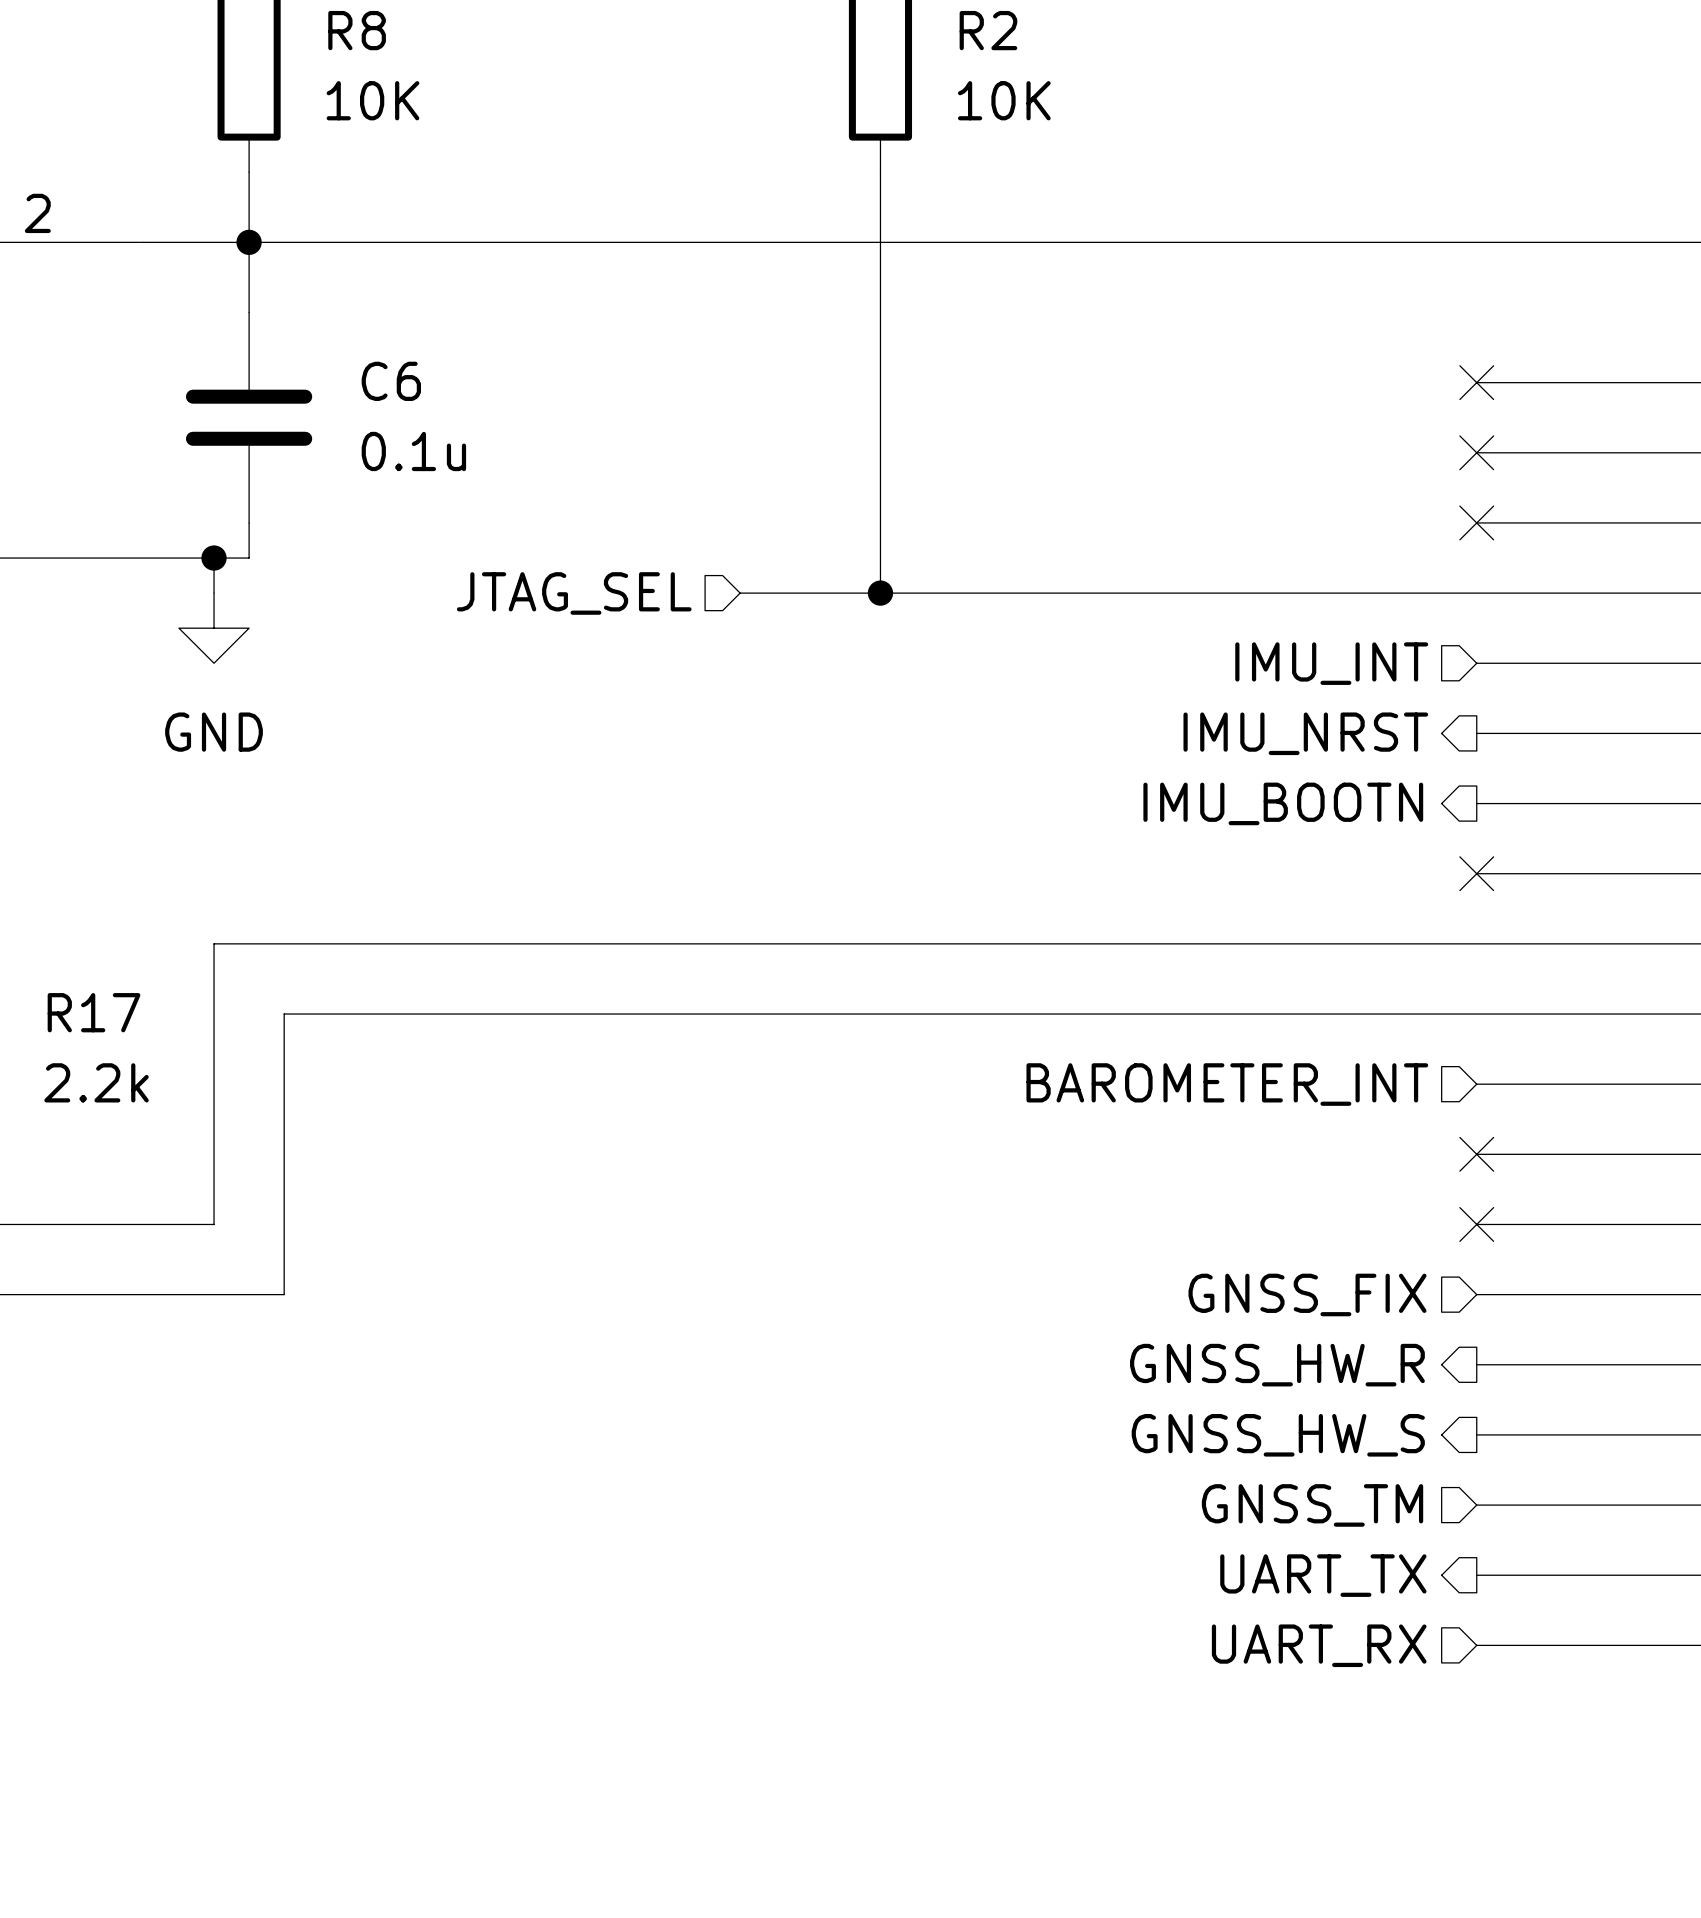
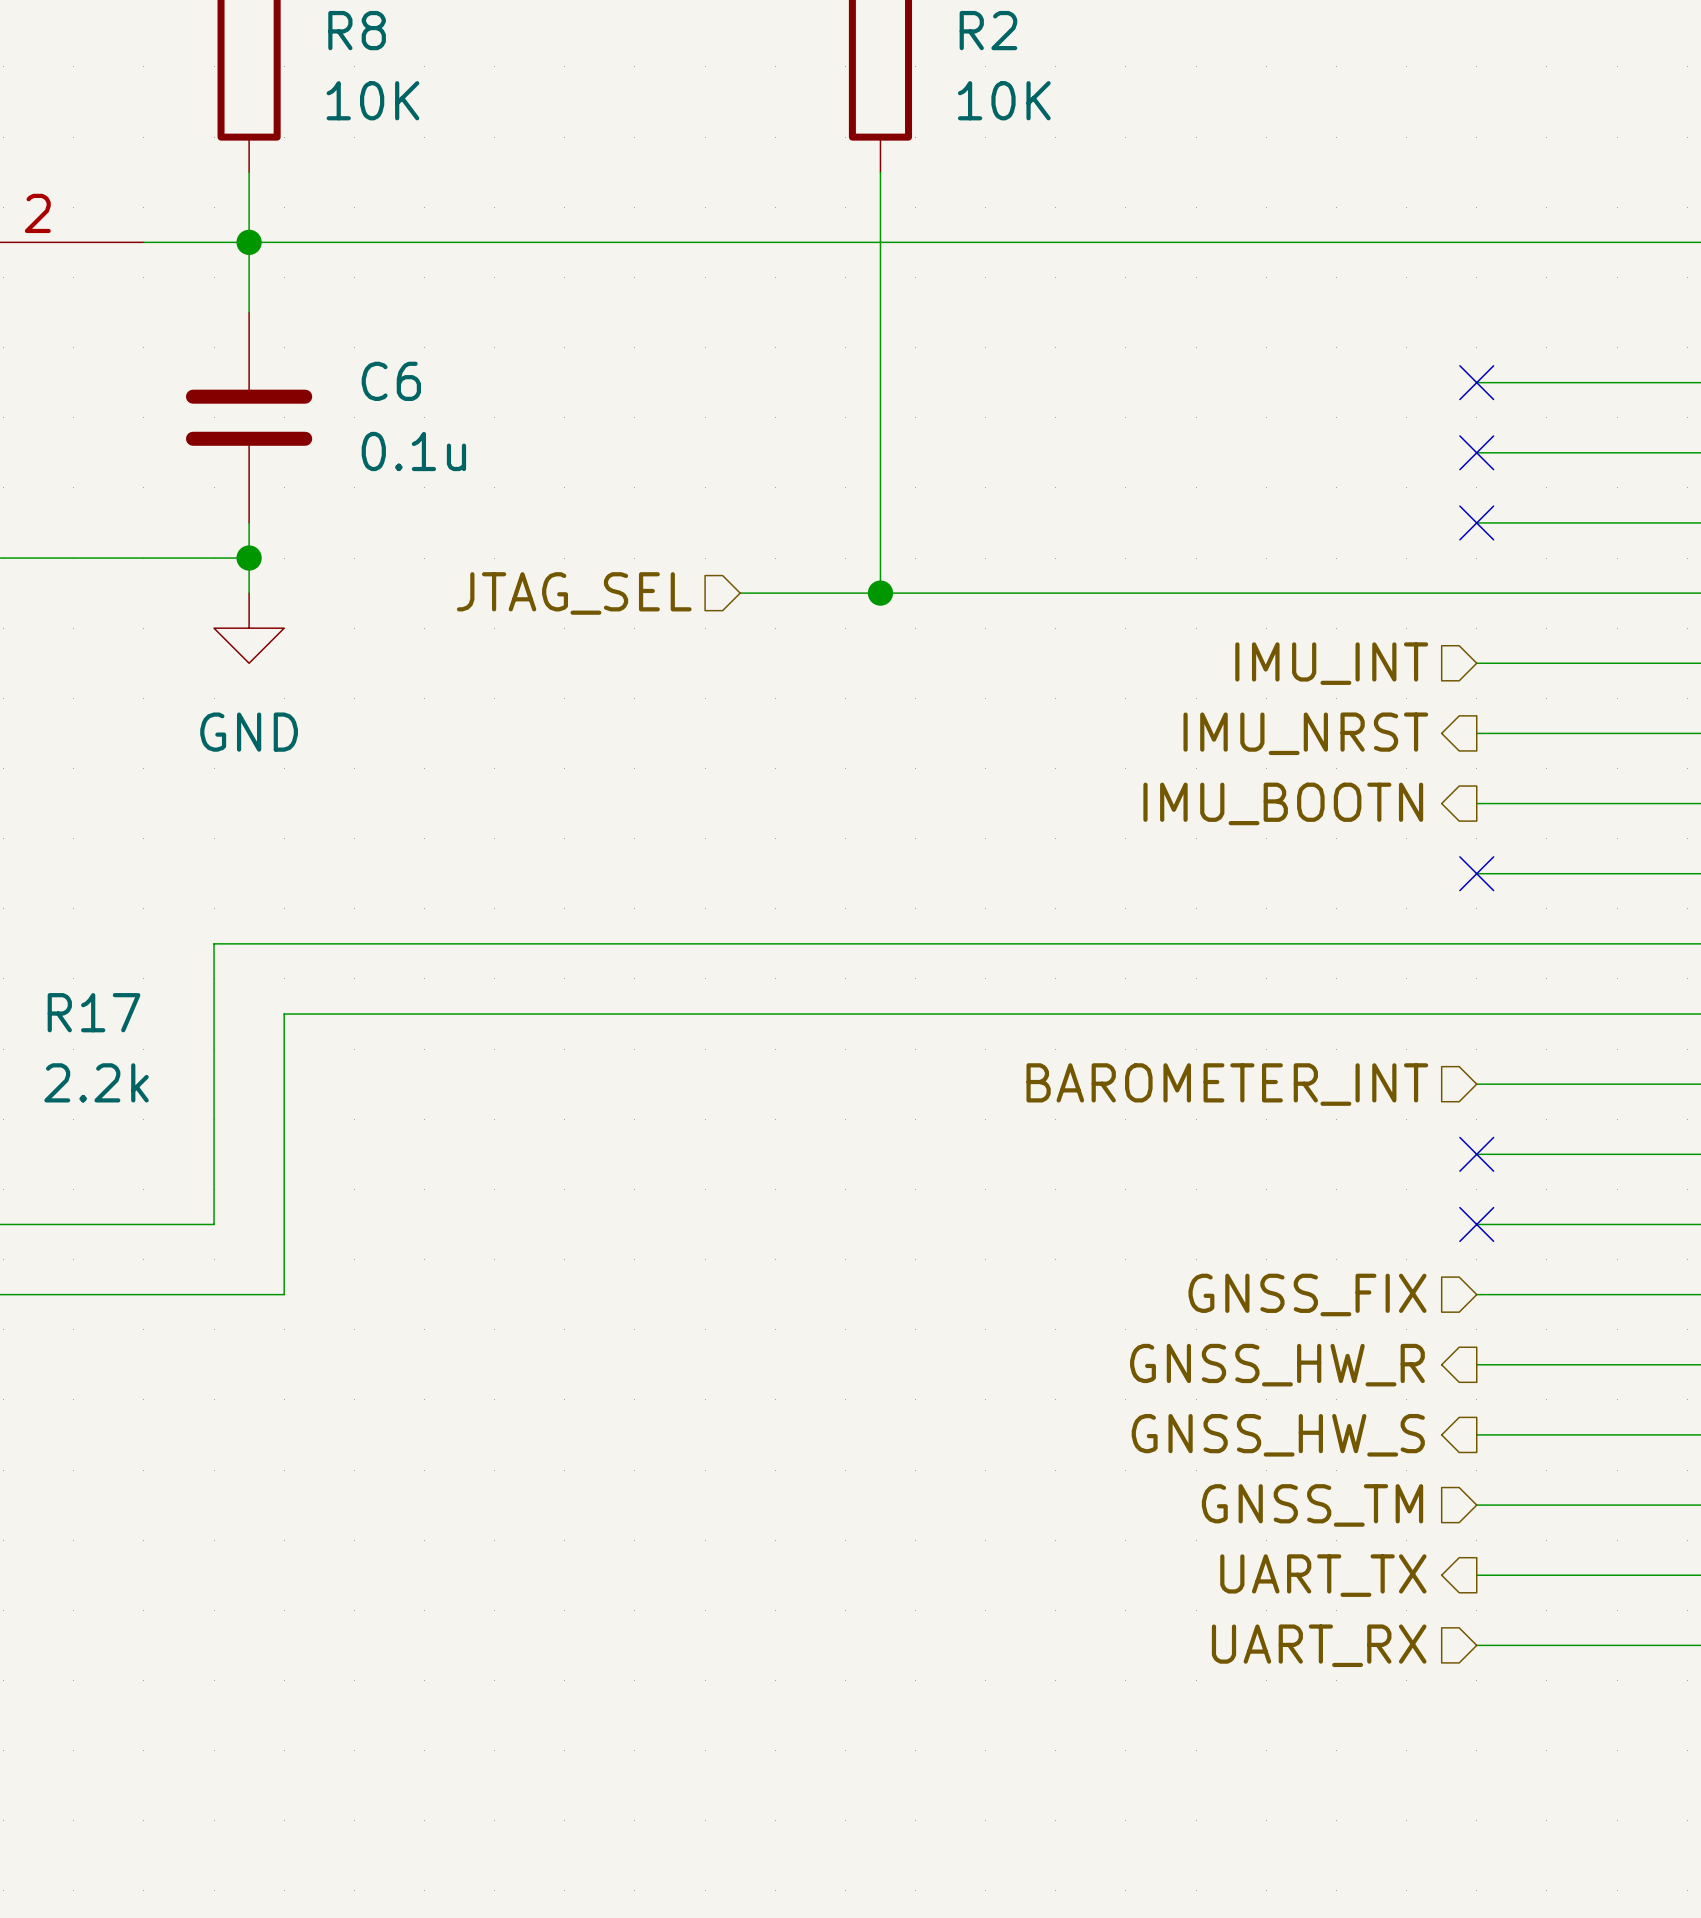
wire: (214, 558) (214, 593) -> (249, 558) (249, 593)
junction position: (214, 558) -> (249, 558)
power symbol position: GND (214, 628) -> GND (249, 628)

